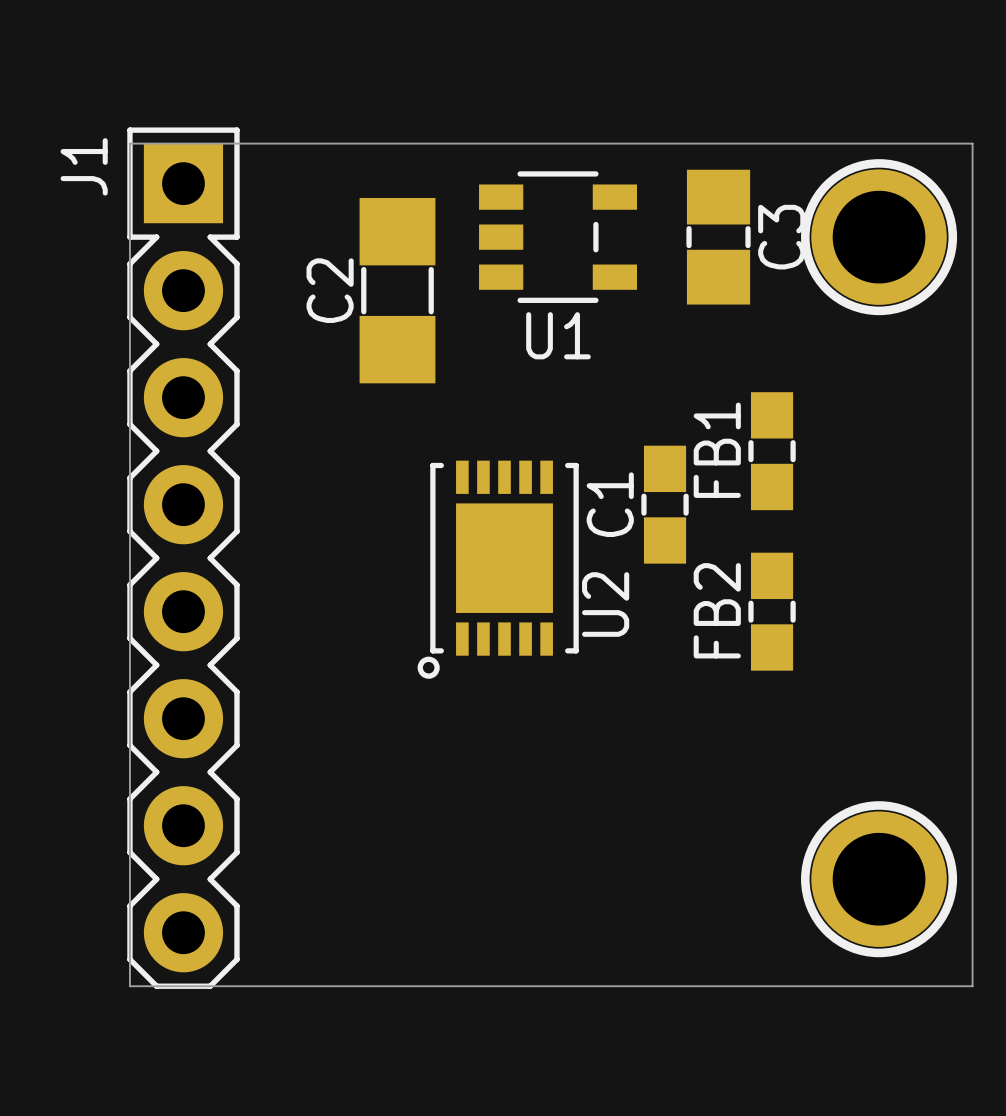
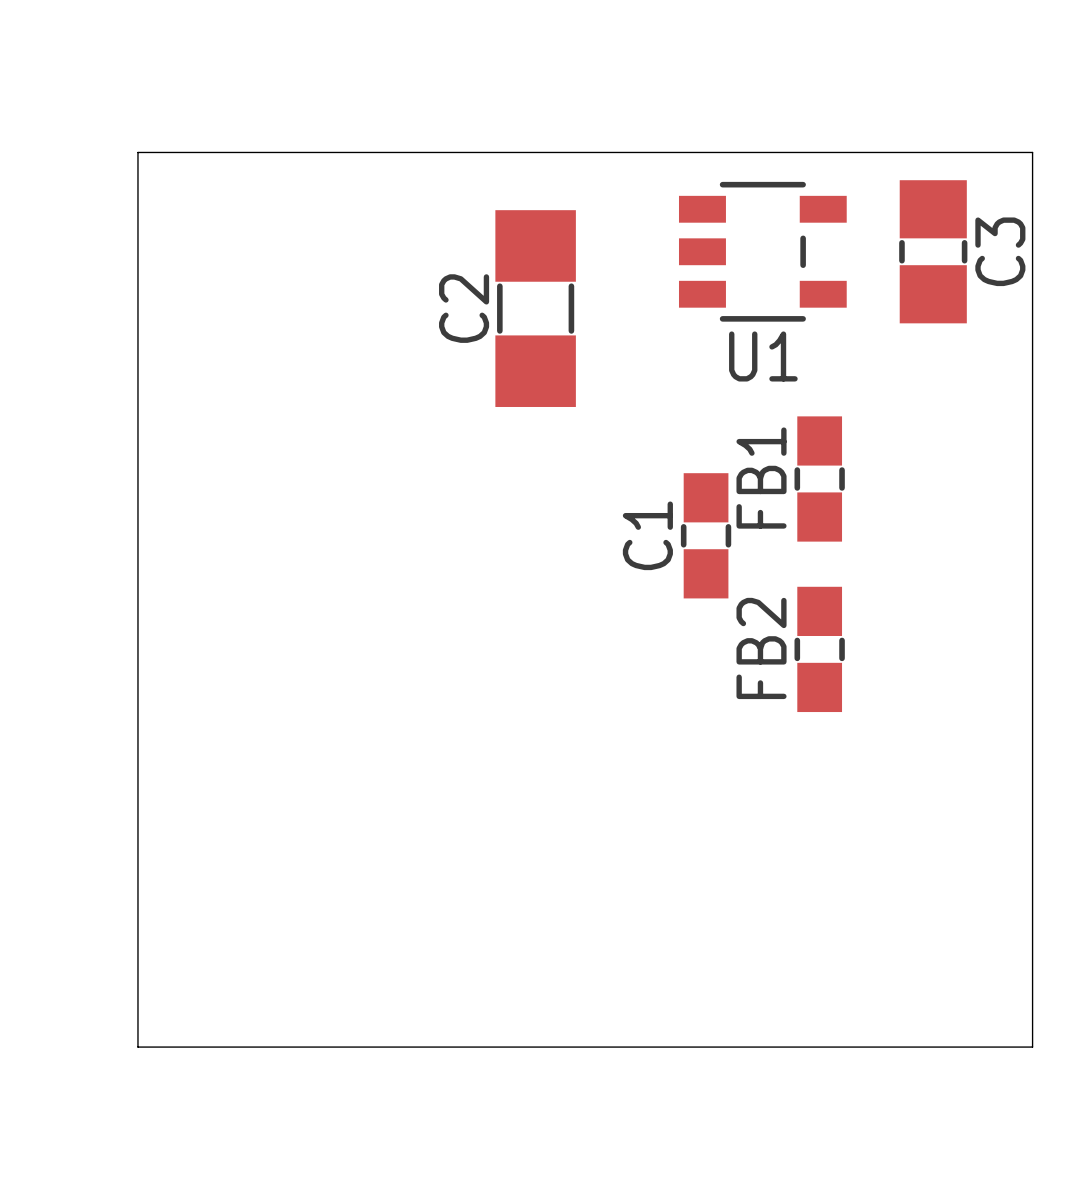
U1 position: (558, 237) -> (762, 251)
C3 position: (718, 237) -> (933, 251)
part: (879, 237) -> none
C2 position: (397, 290) -> (535, 308)
J1: (183, 558) -> none
U2: (498, 569) -> none
part: (879, 879) -> none

